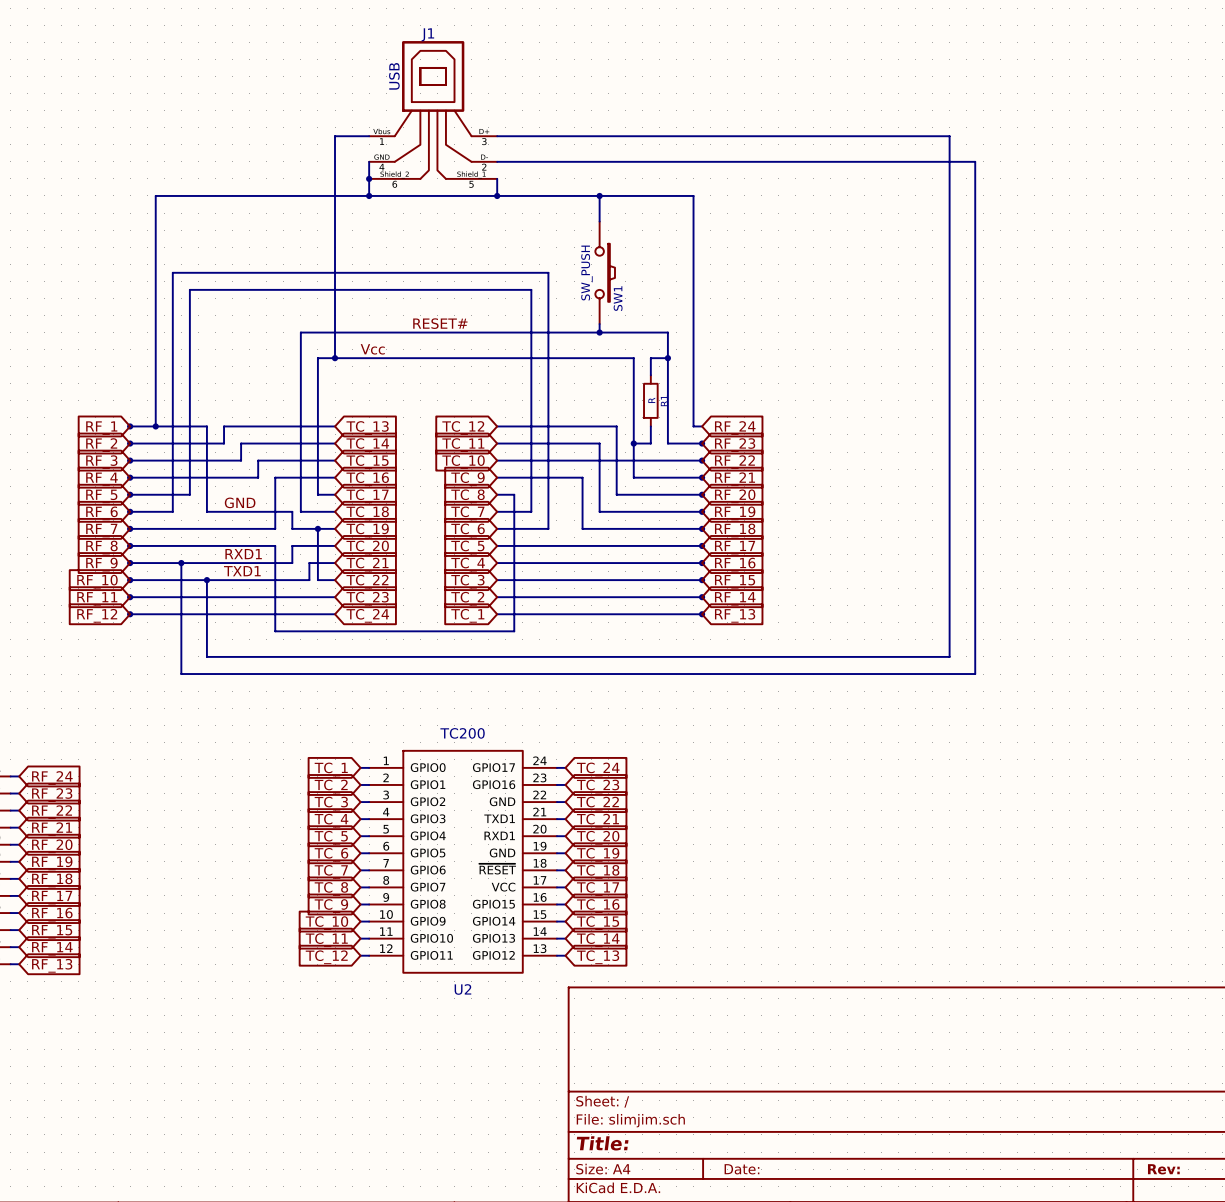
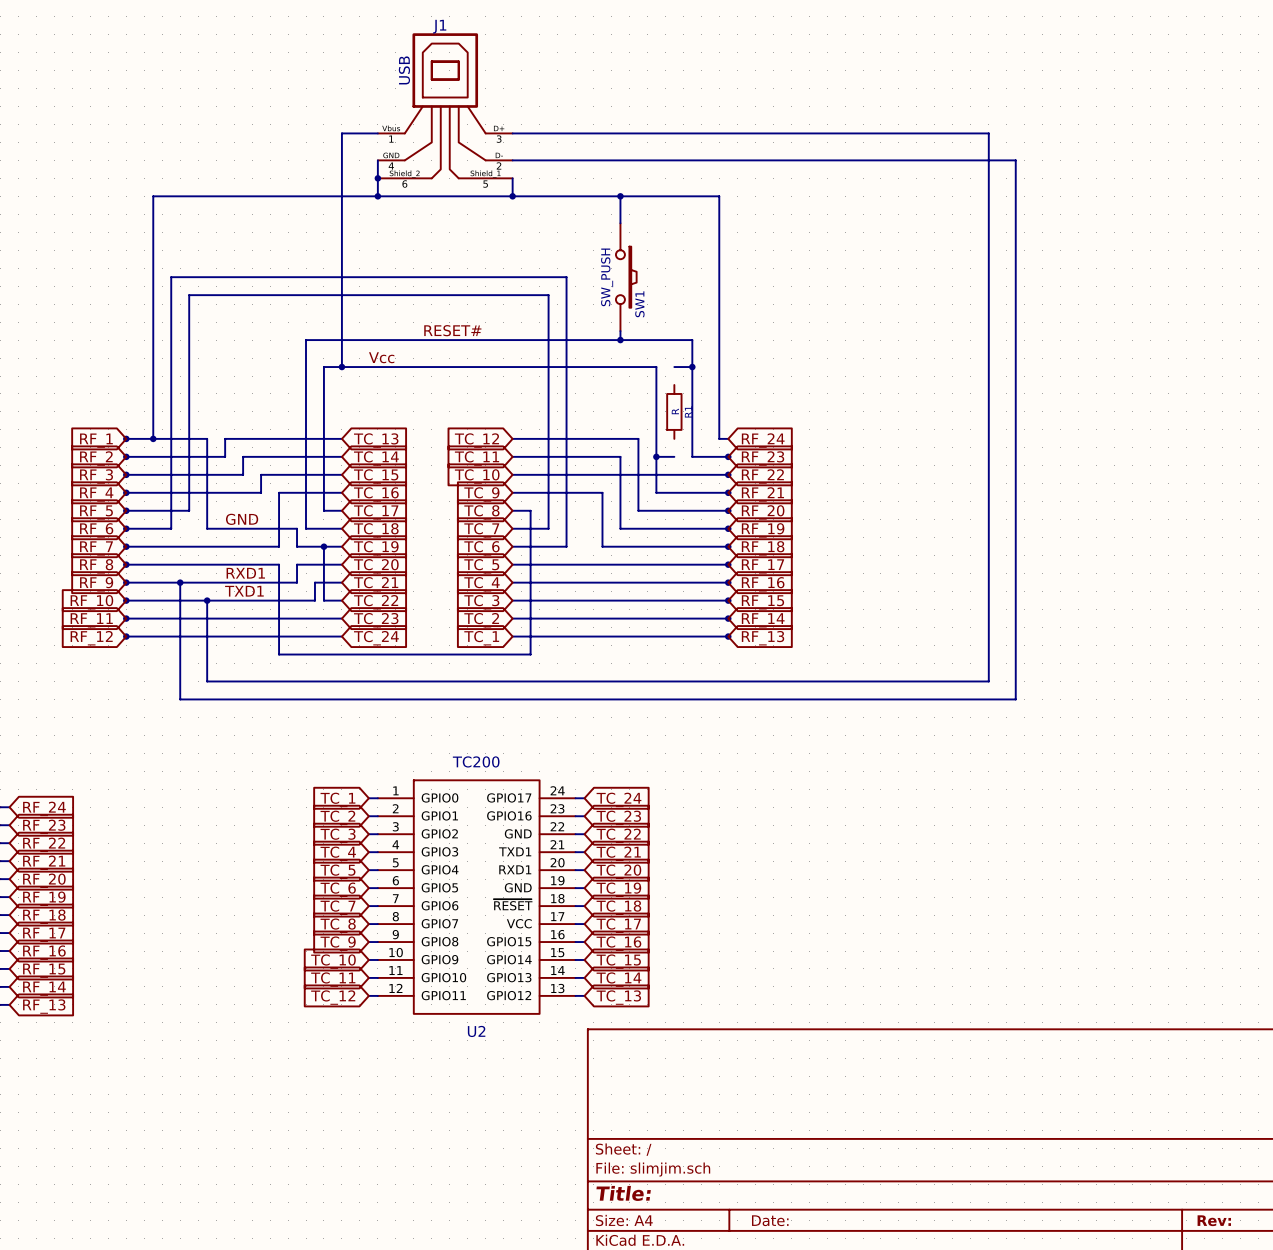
wire: (650, 358) (650, 375) -> none
wire: (650, 426) (650, 443) -> none

